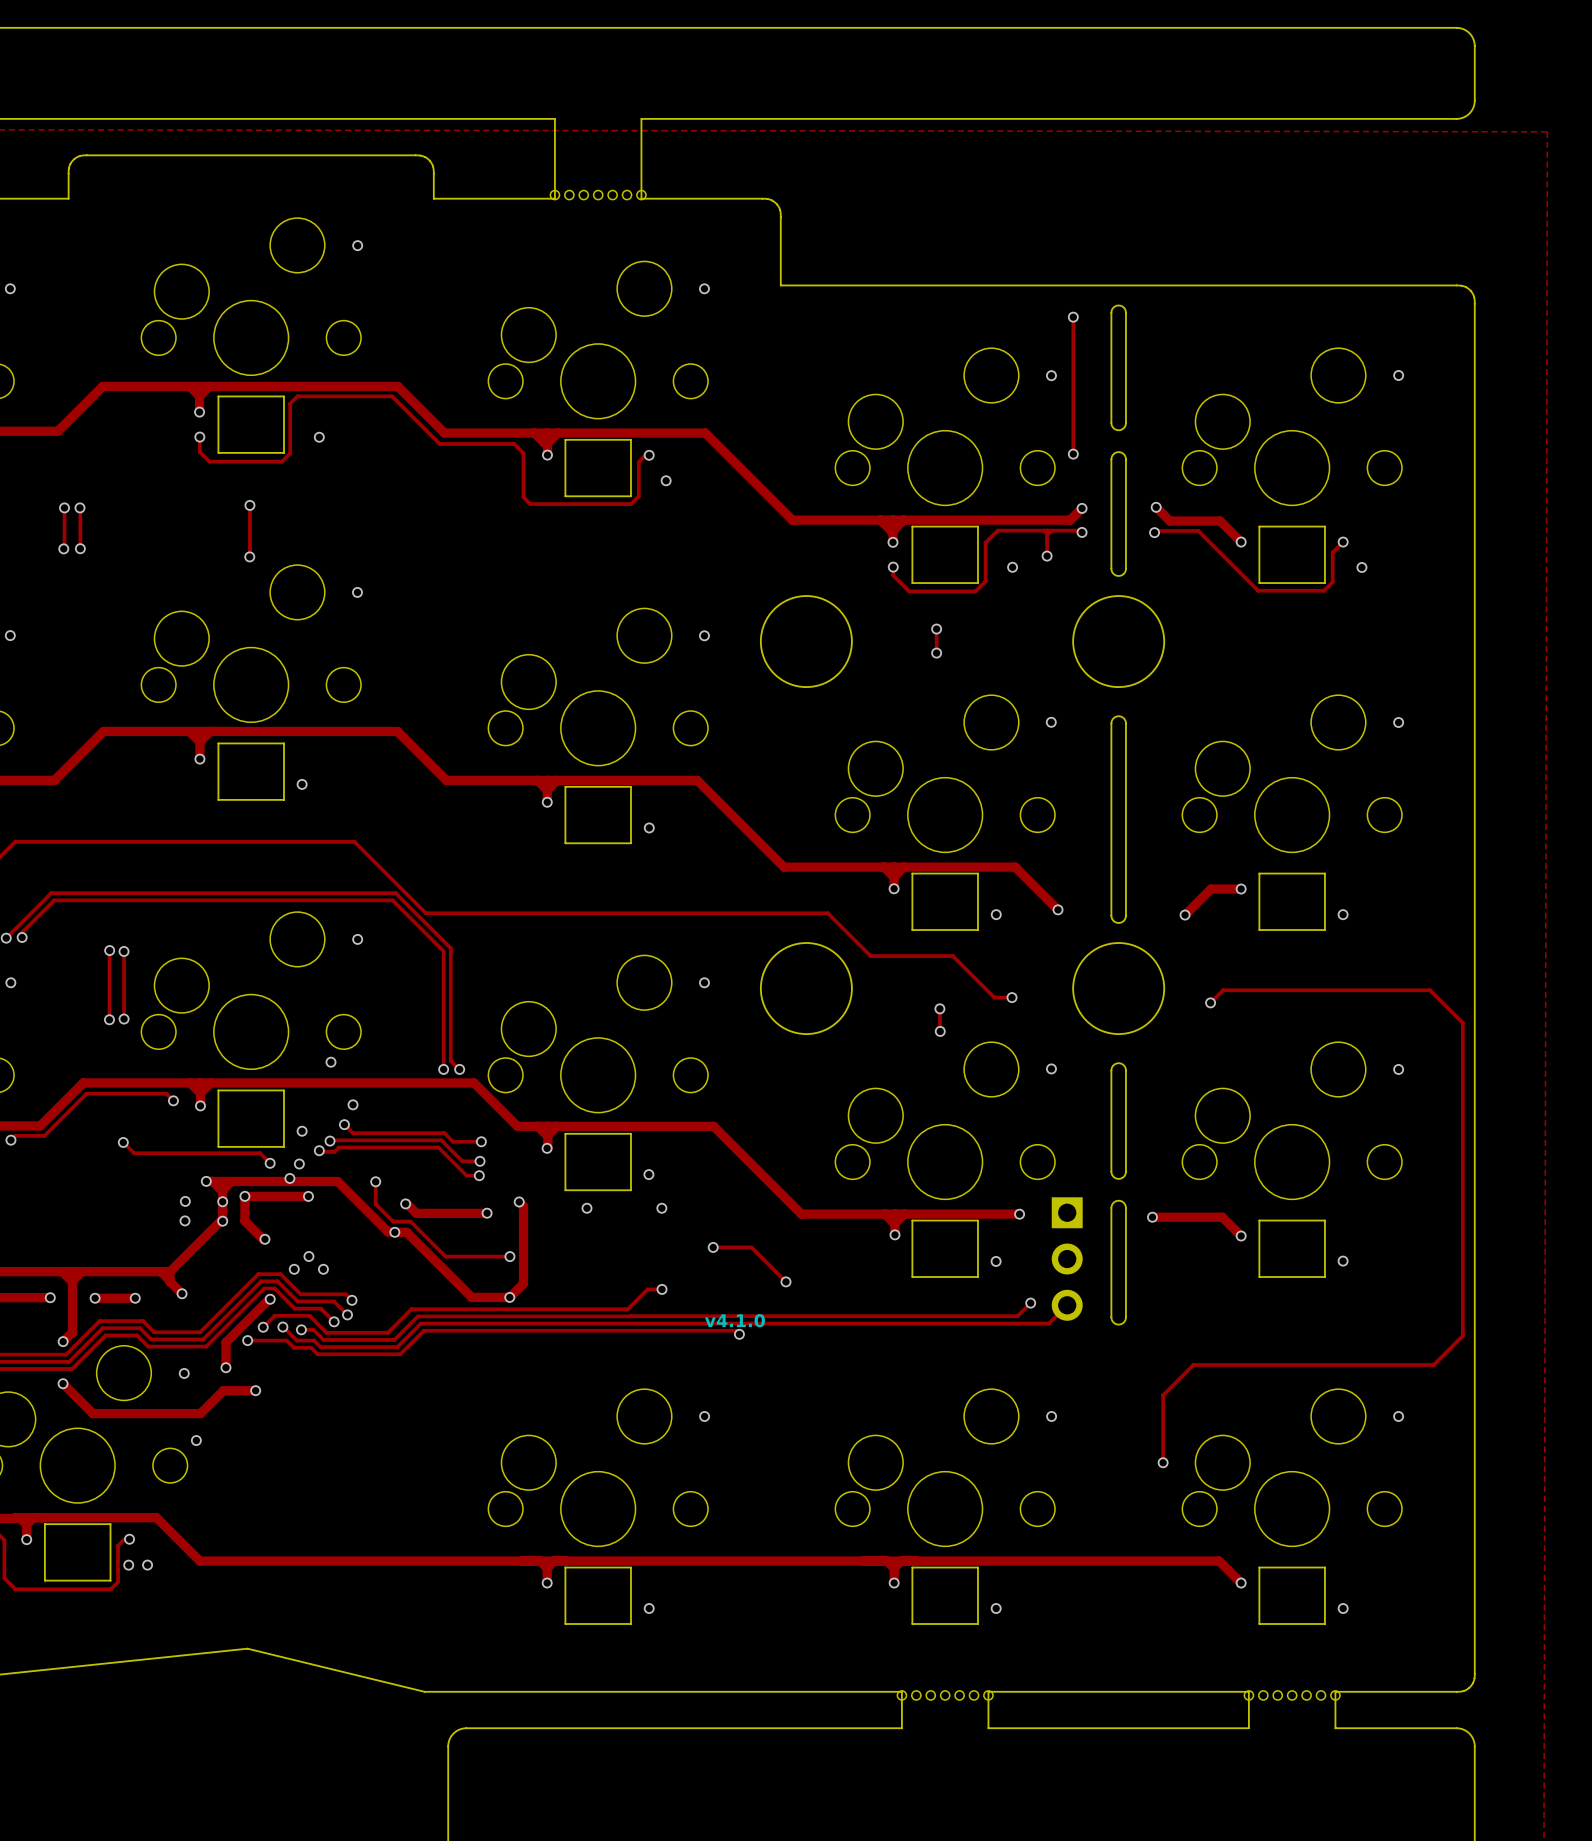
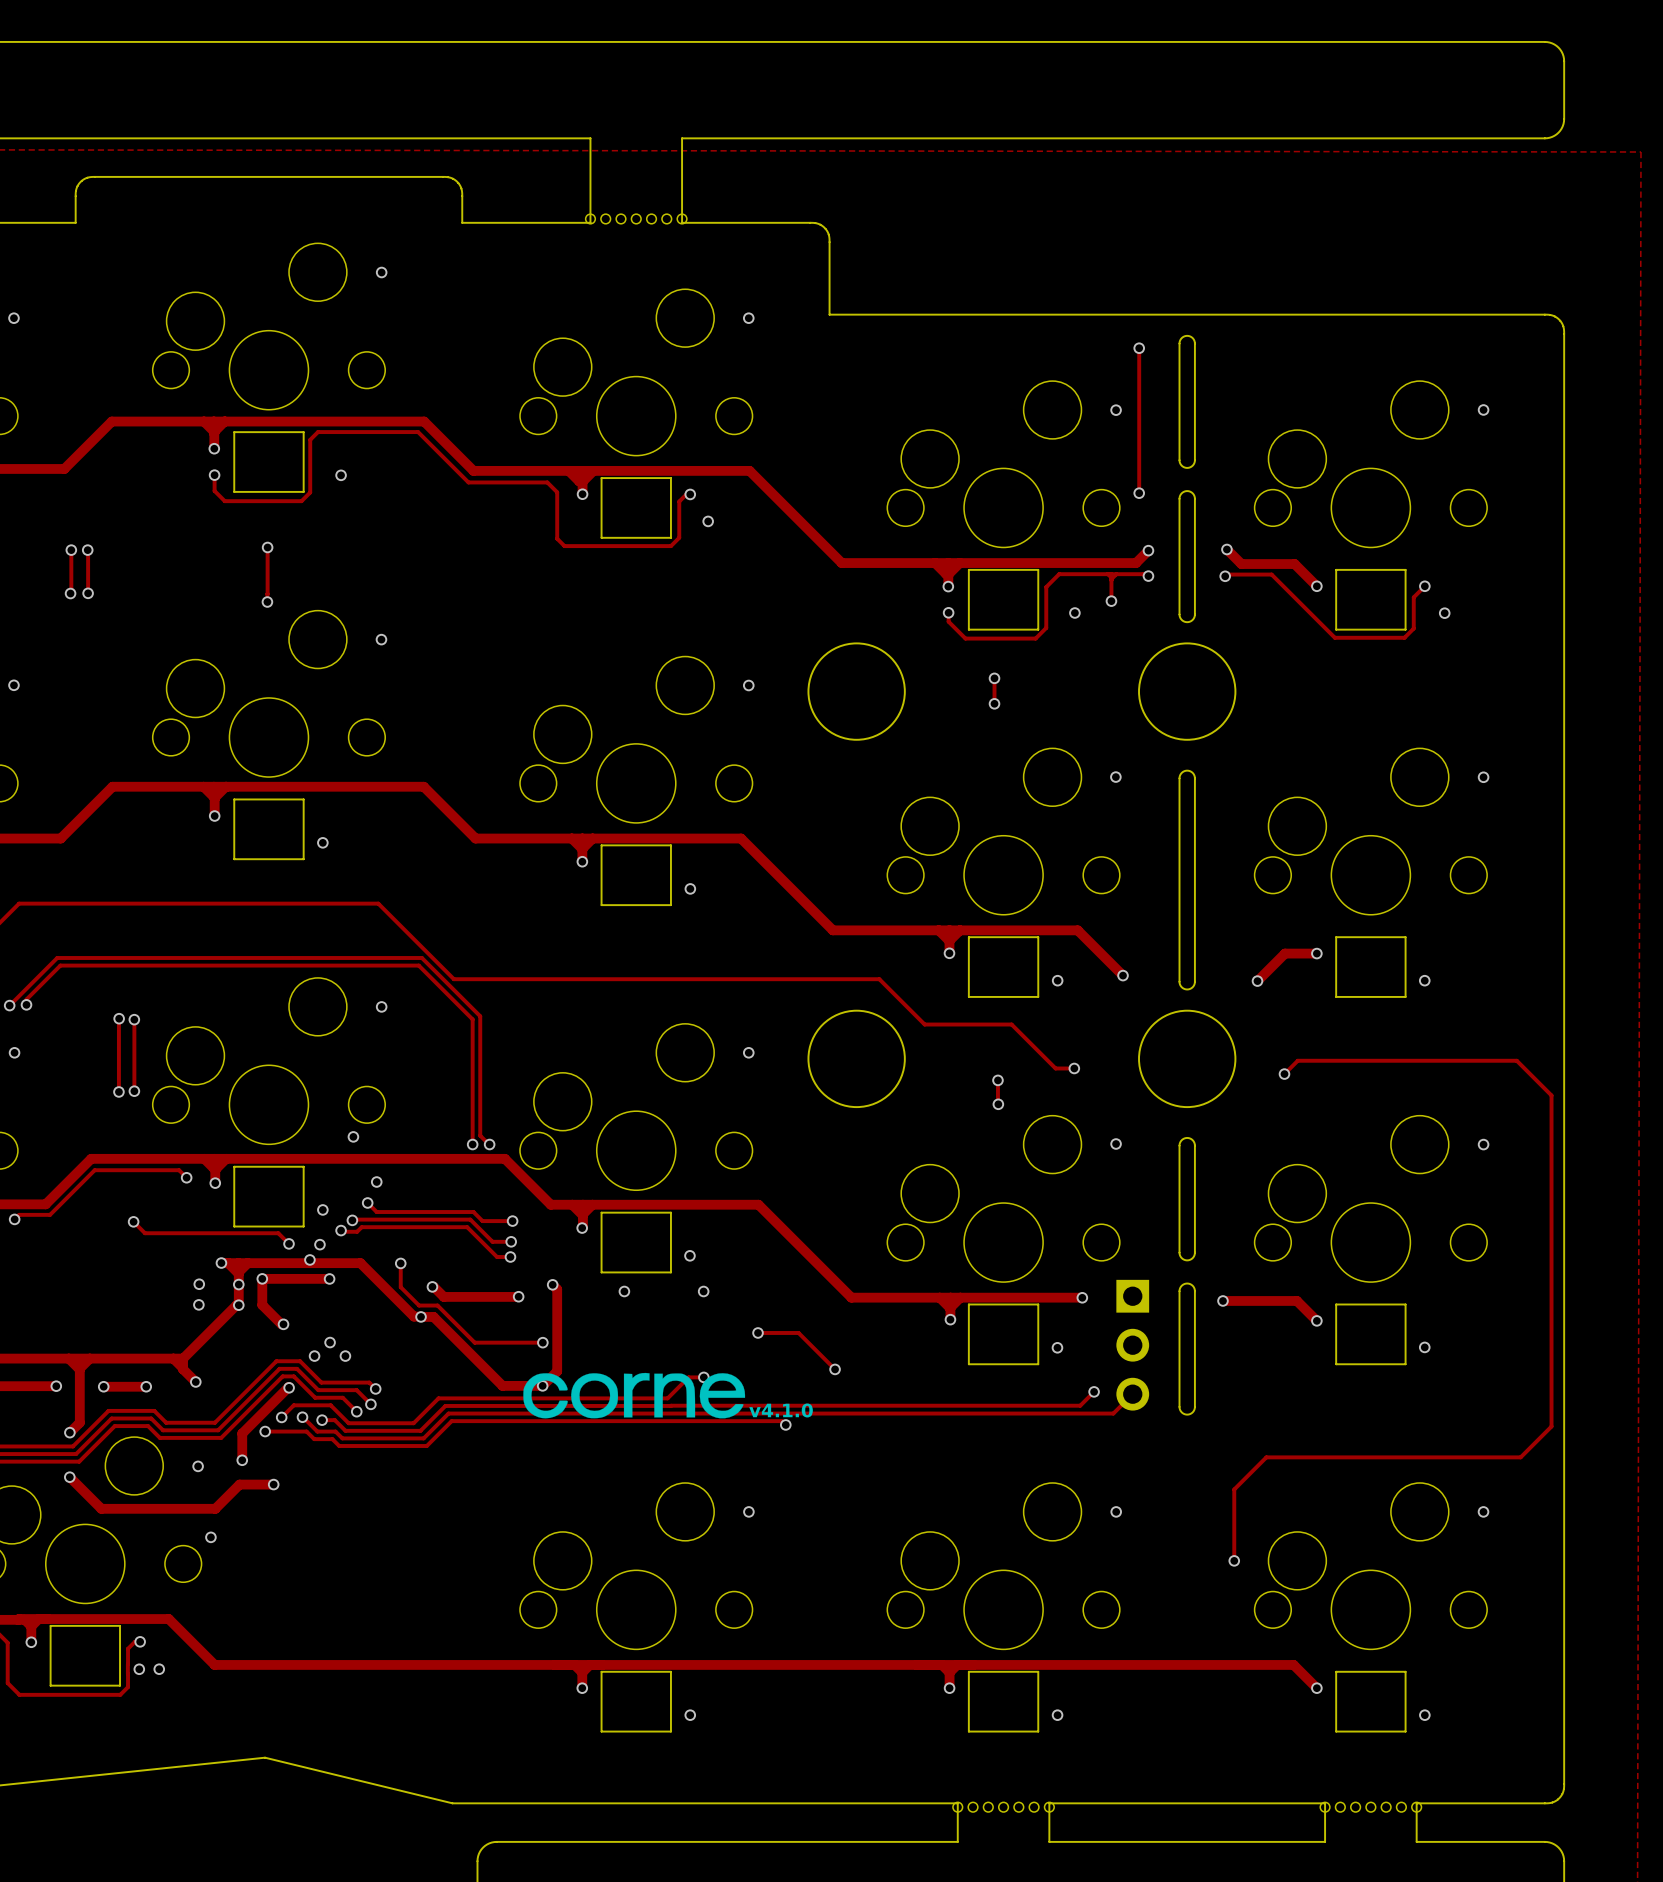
drawing: none -> [523, 1372, 746, 1419]

